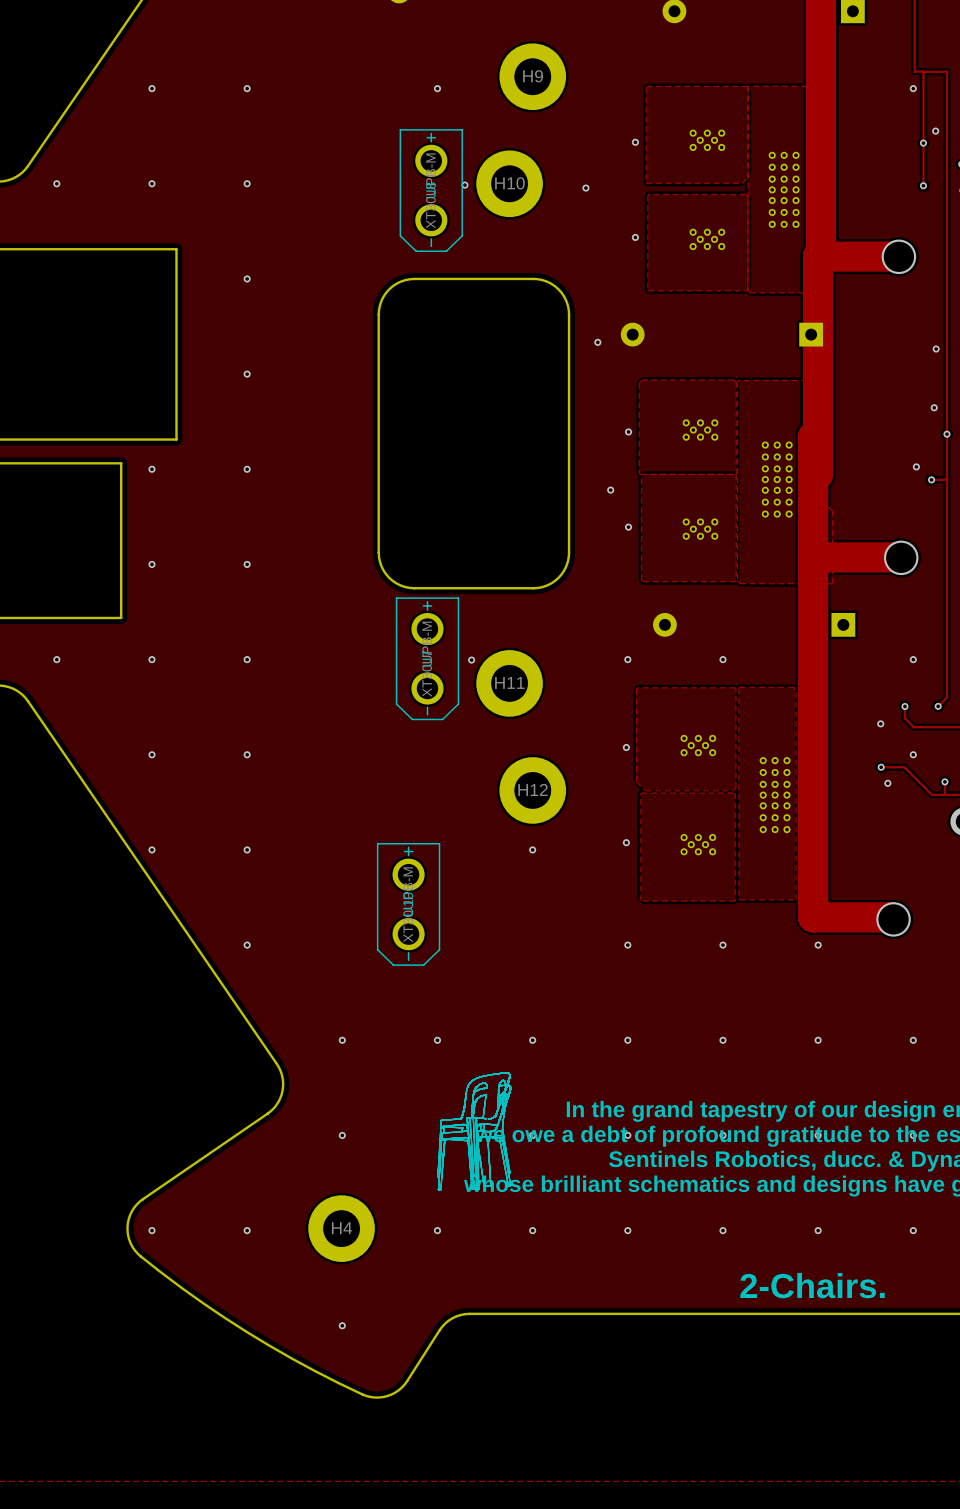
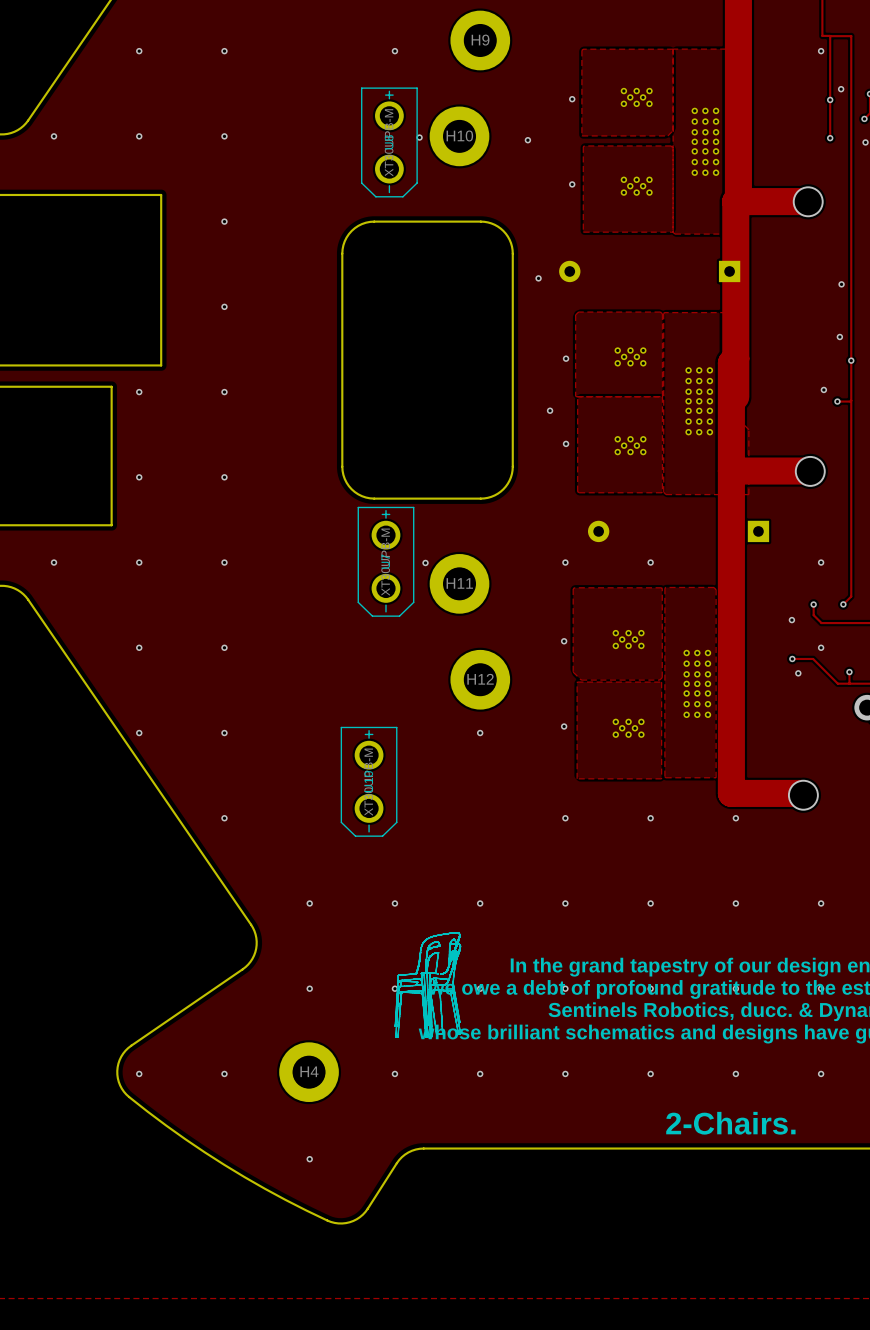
via: none -> (394, 988)

